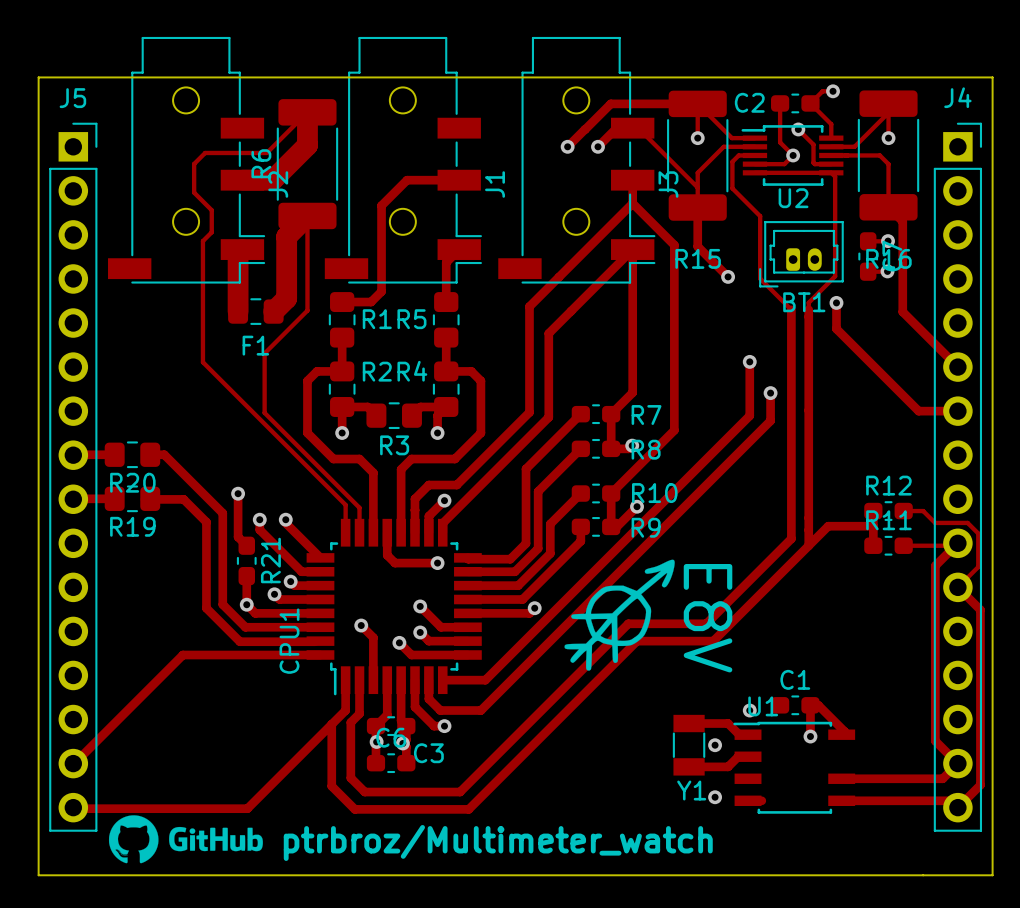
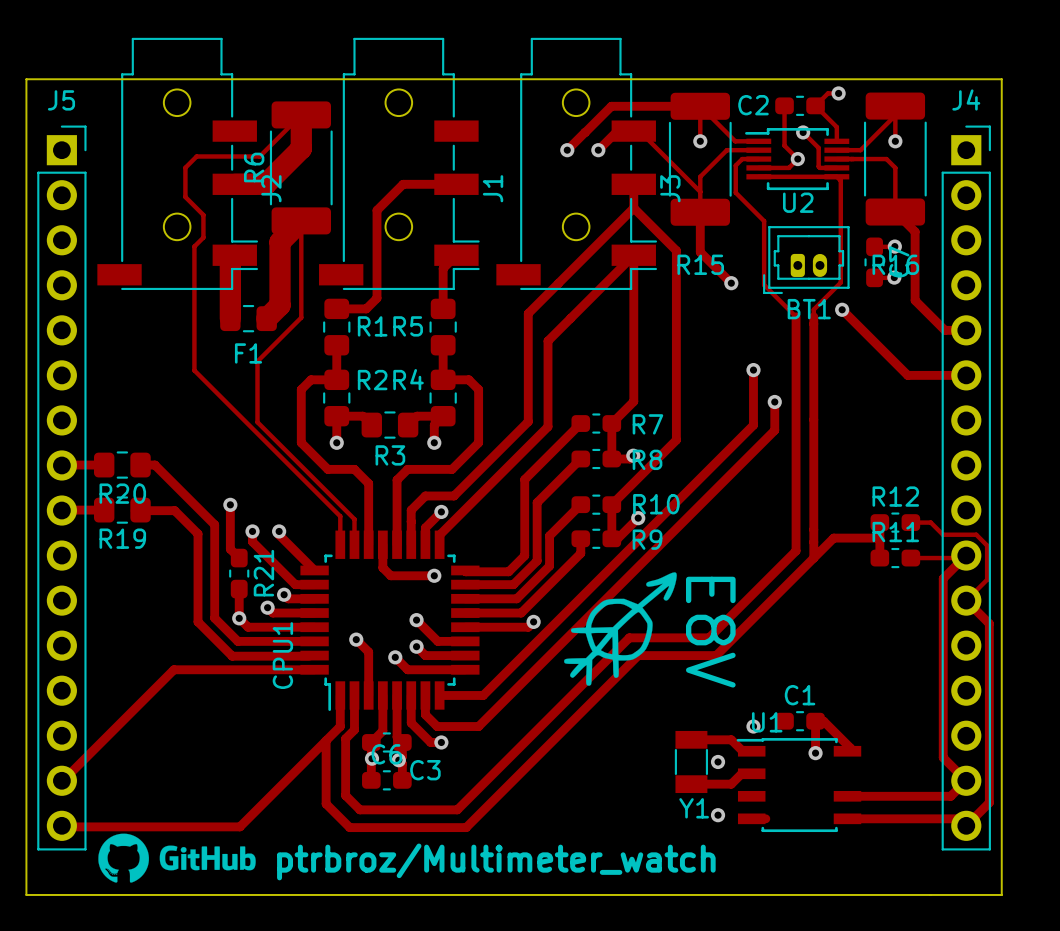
track: (902, 221) (902, 311) (957, 367) -> (909, 226) (915, 231) (915, 300) (944, 330) (966, 330)
track: (836, 302) (836, 328) (918, 411) (957, 411) -> (842, 309) (907, 375) (966, 375)

